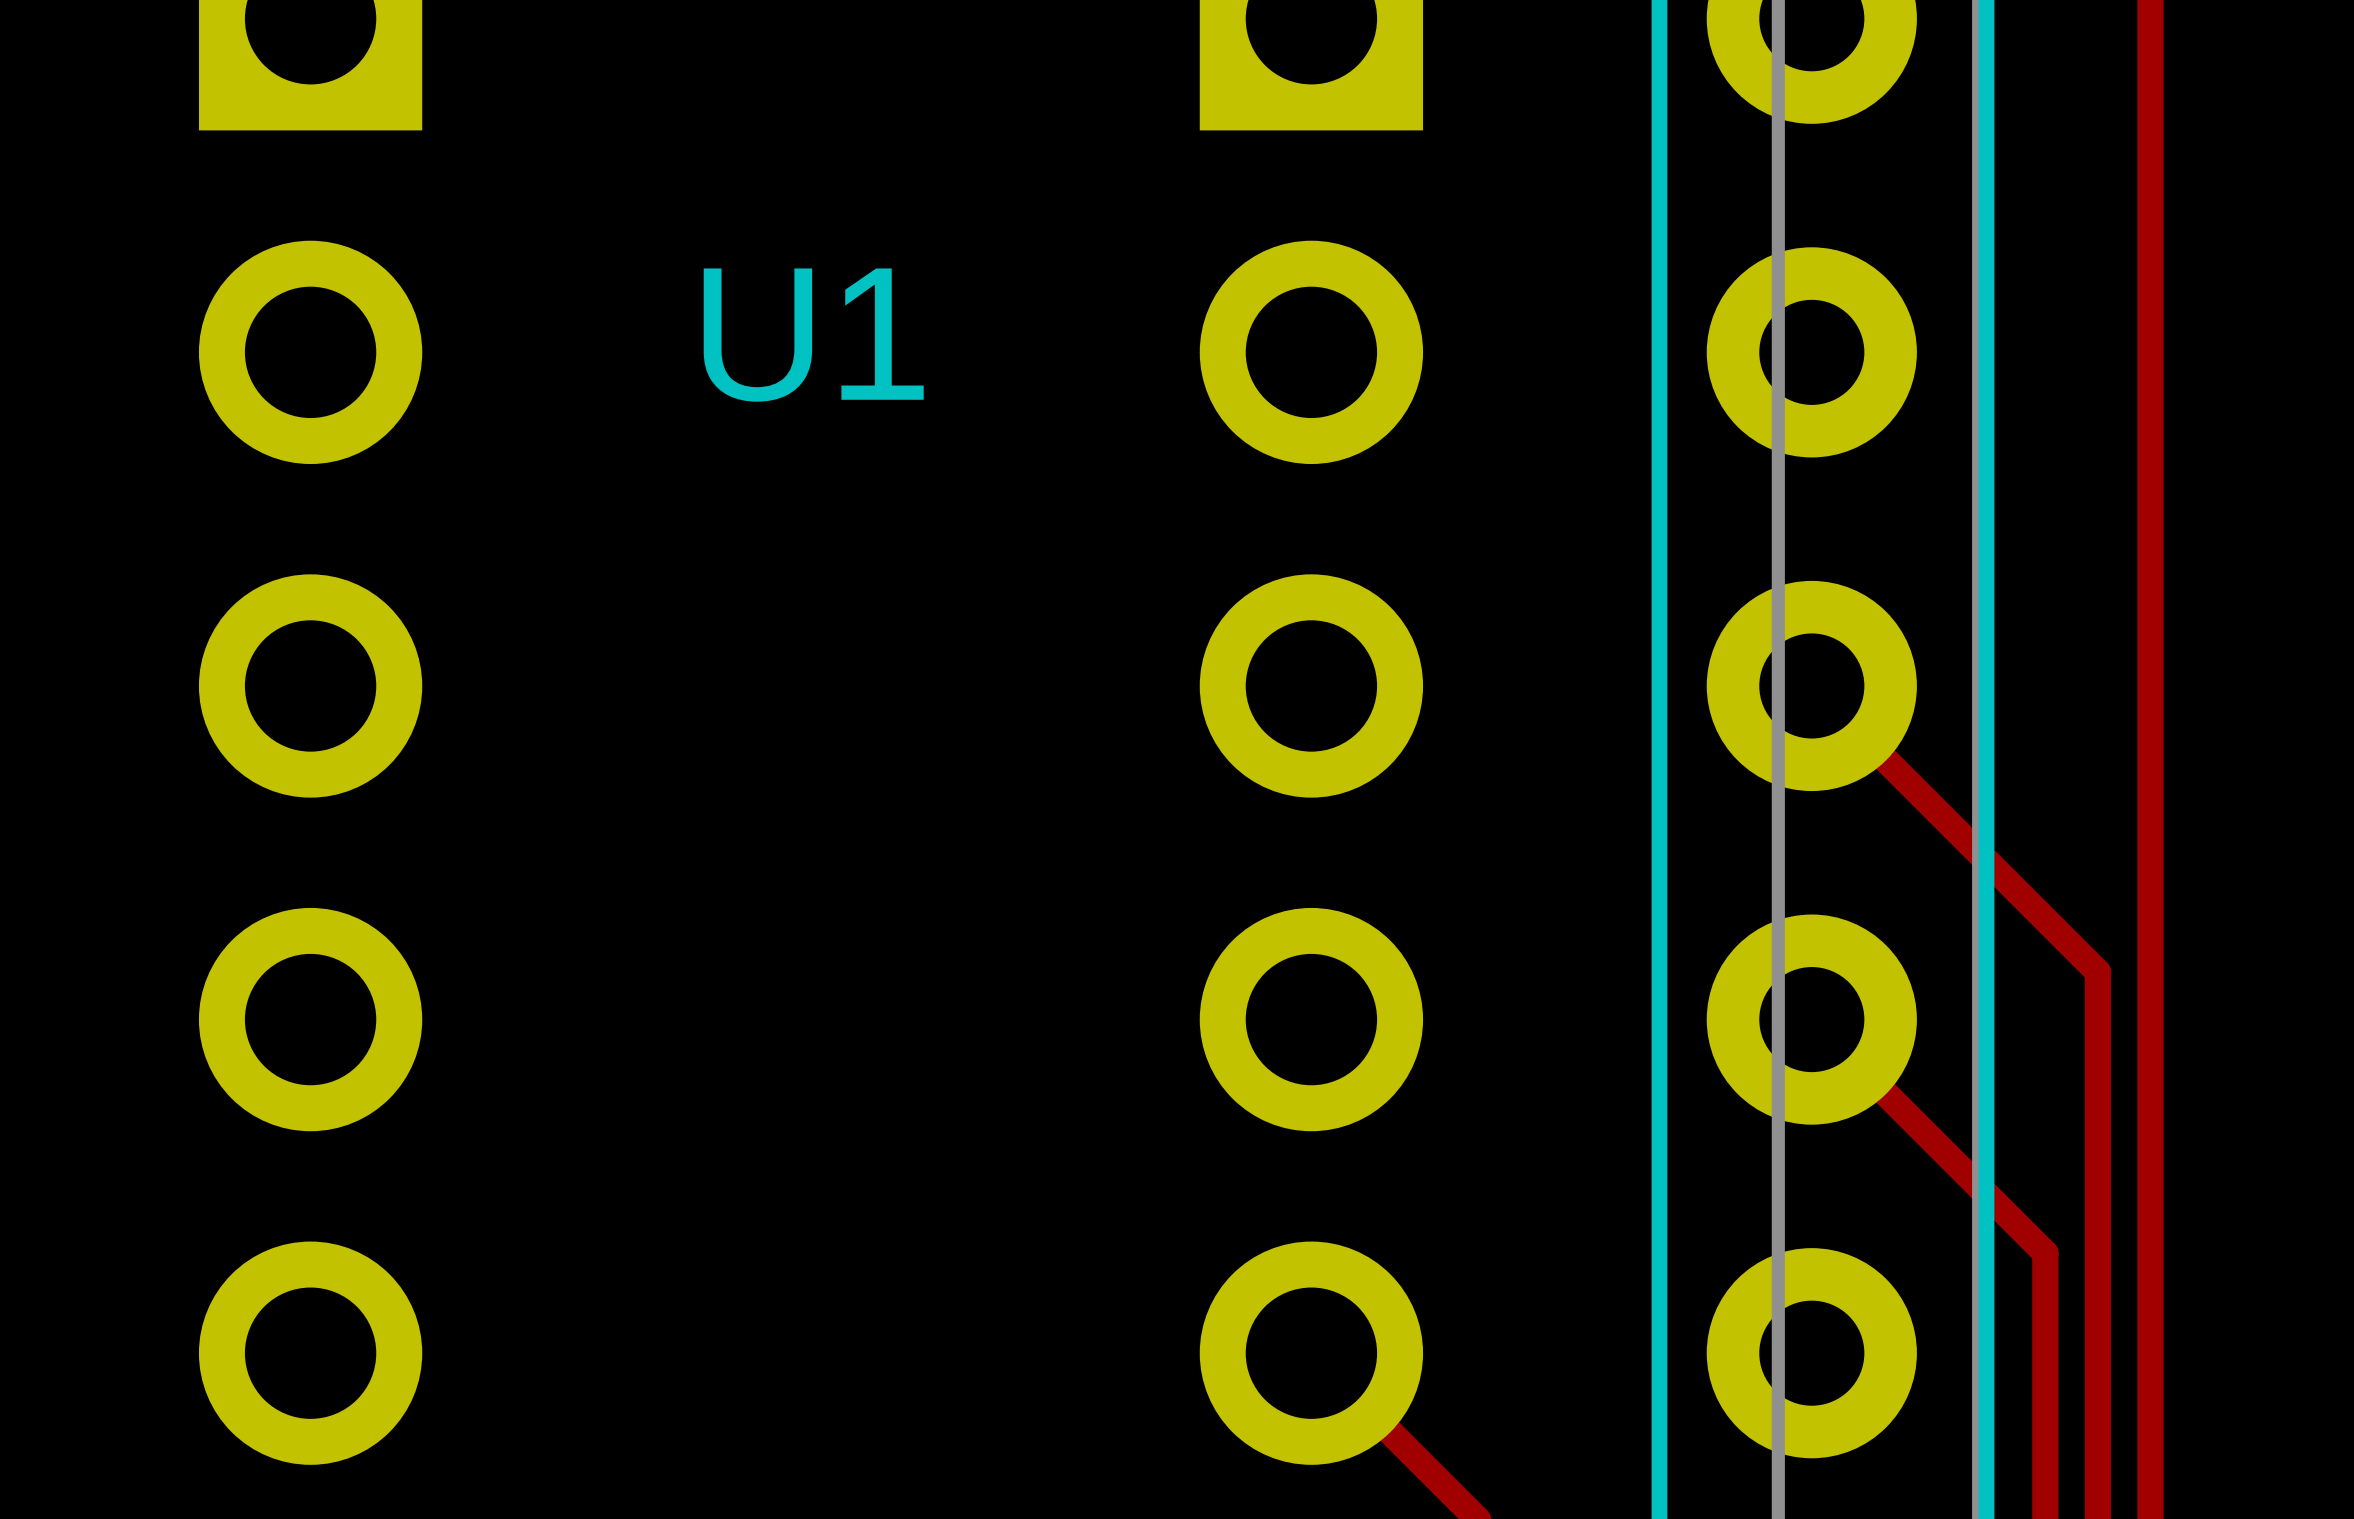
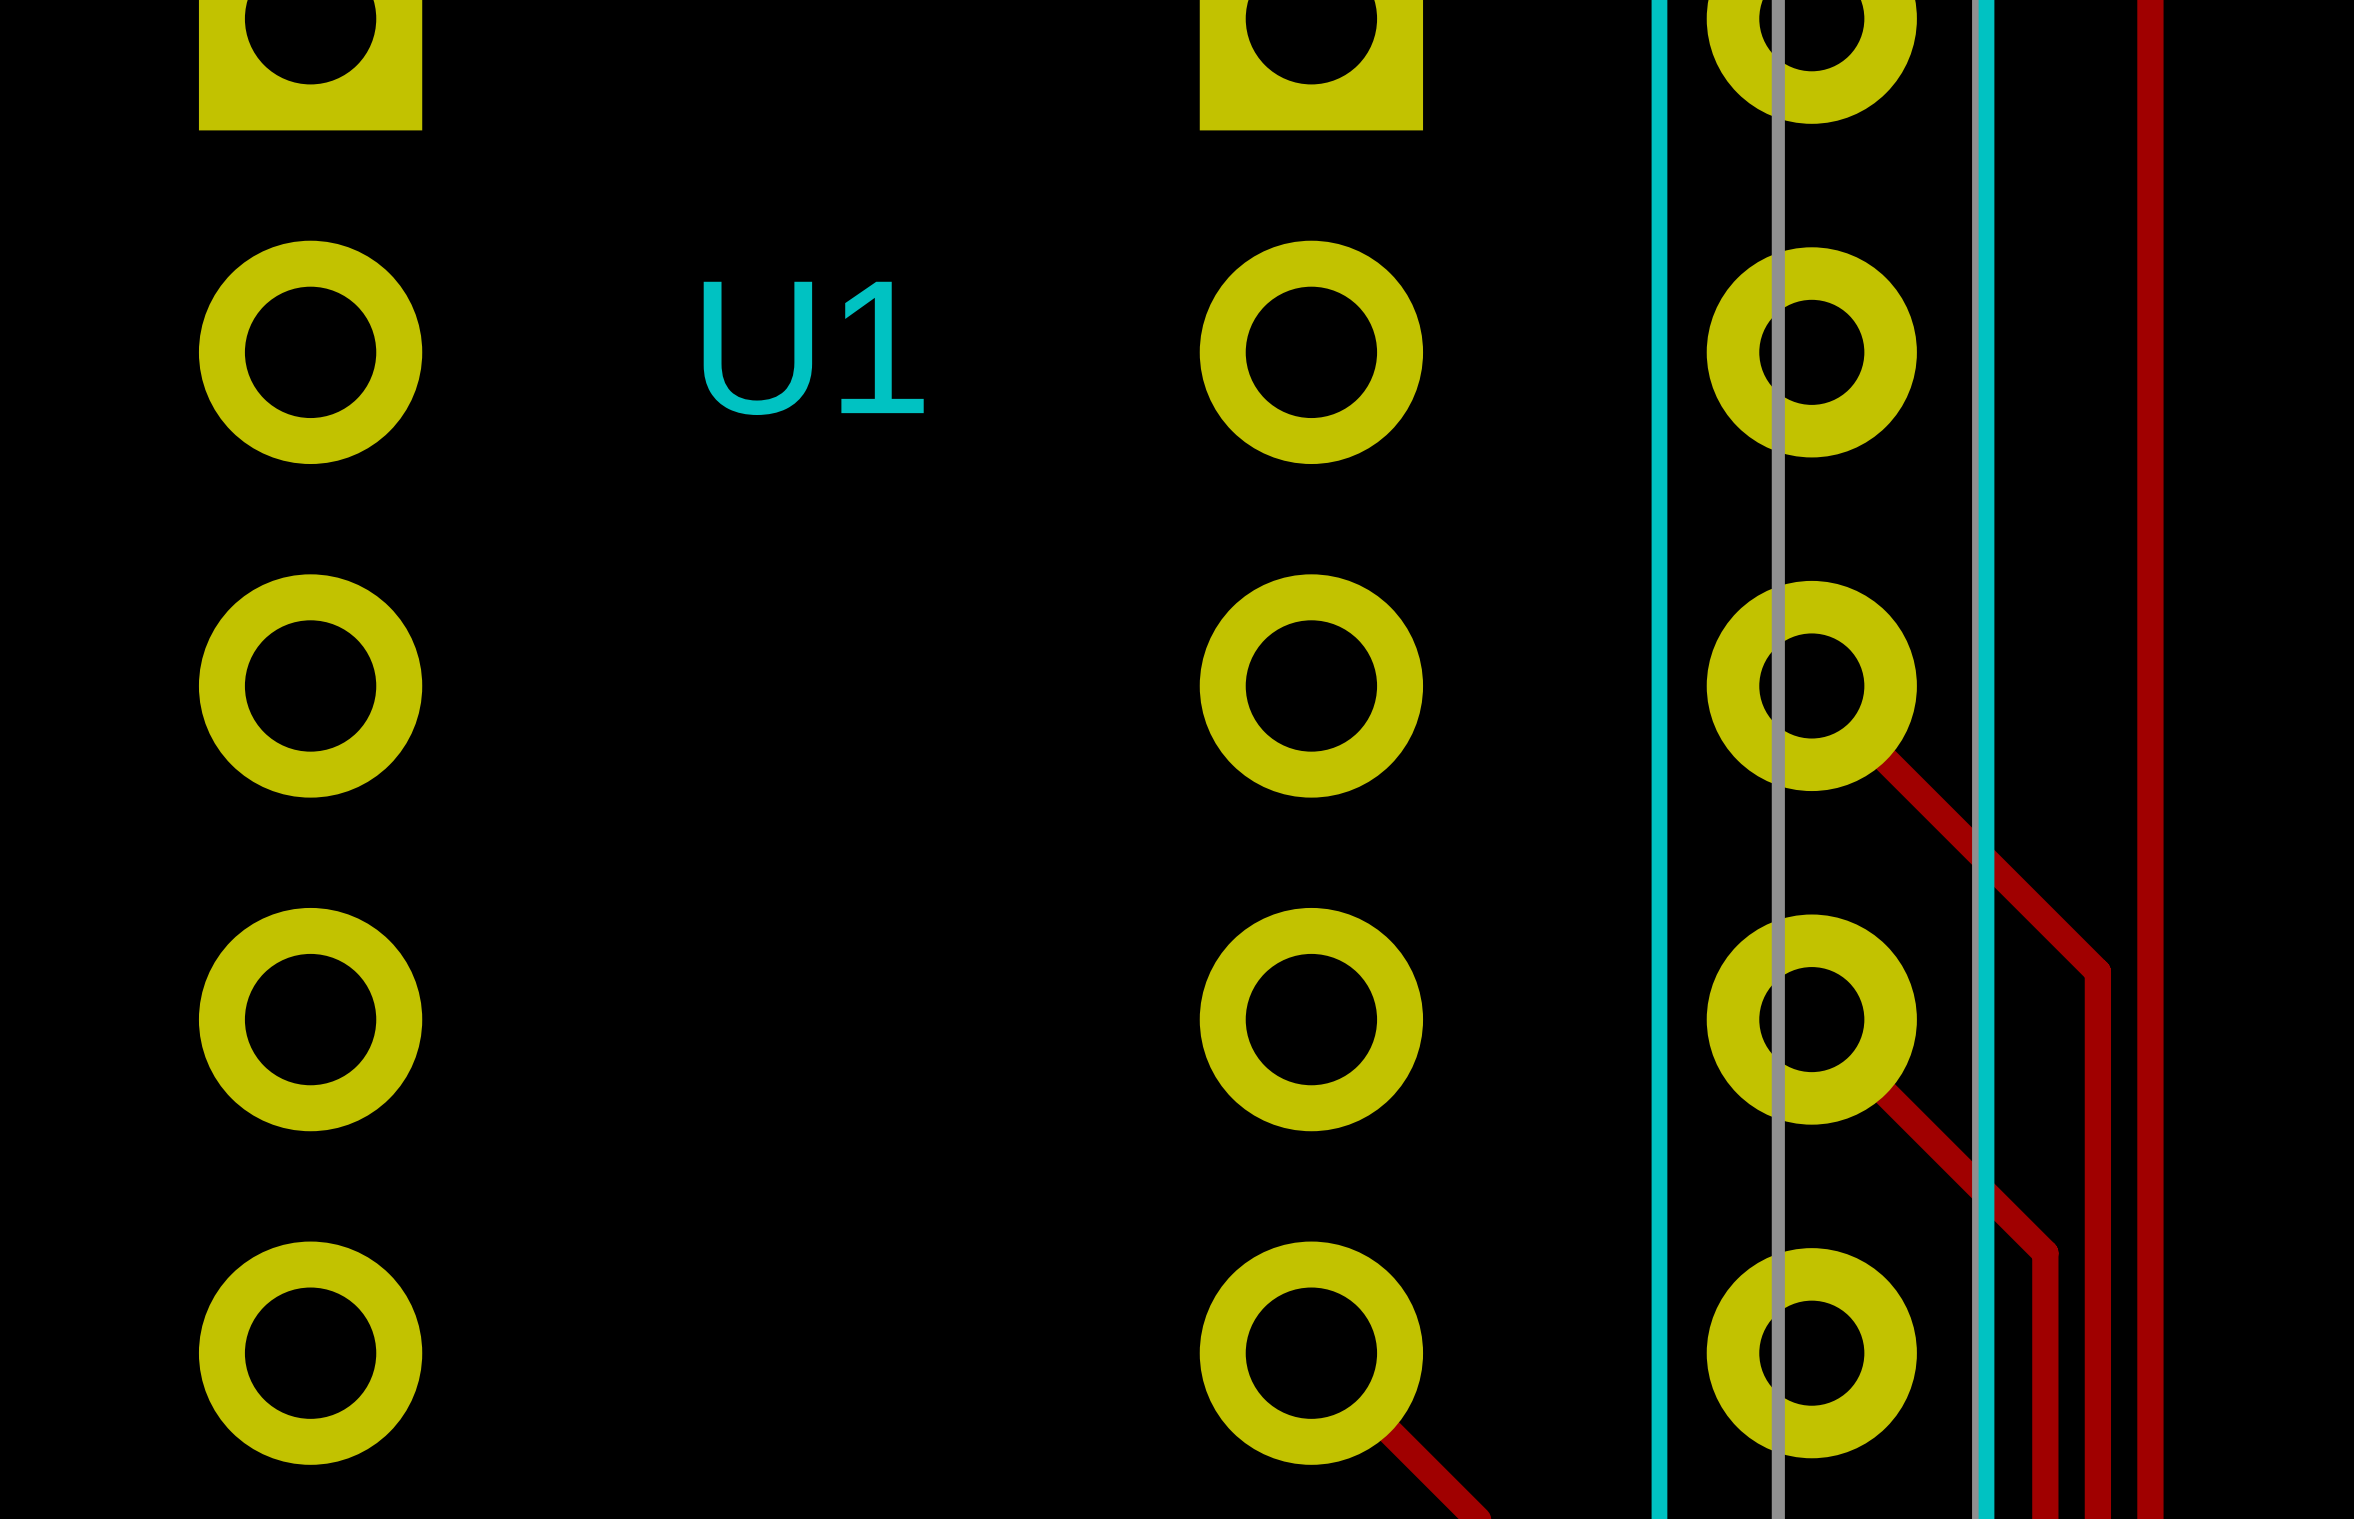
U1 name position: U1 (813, 335) -> U1 (813, 348)

